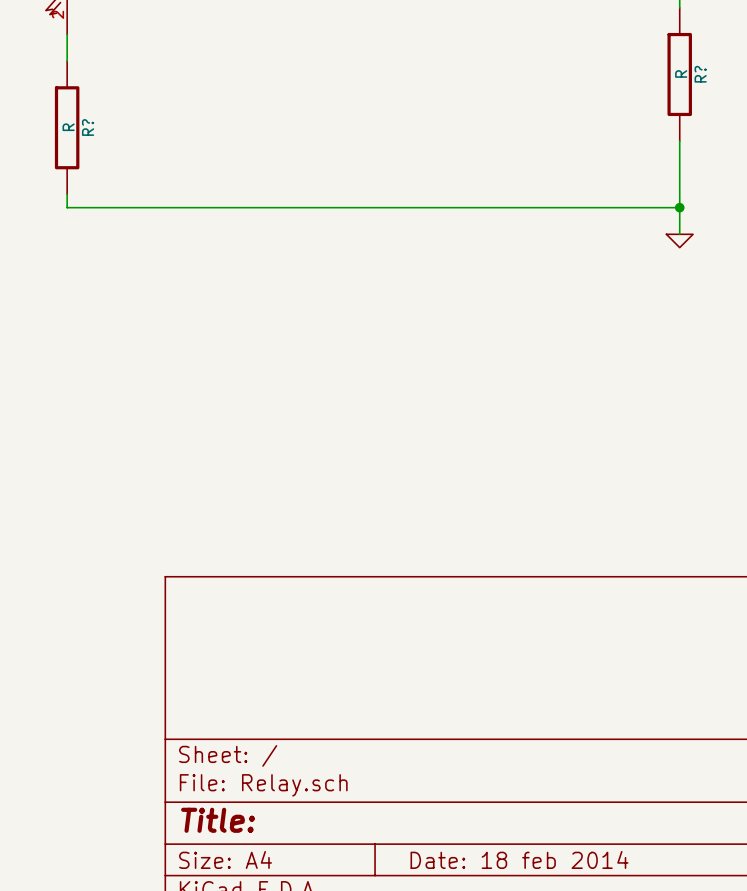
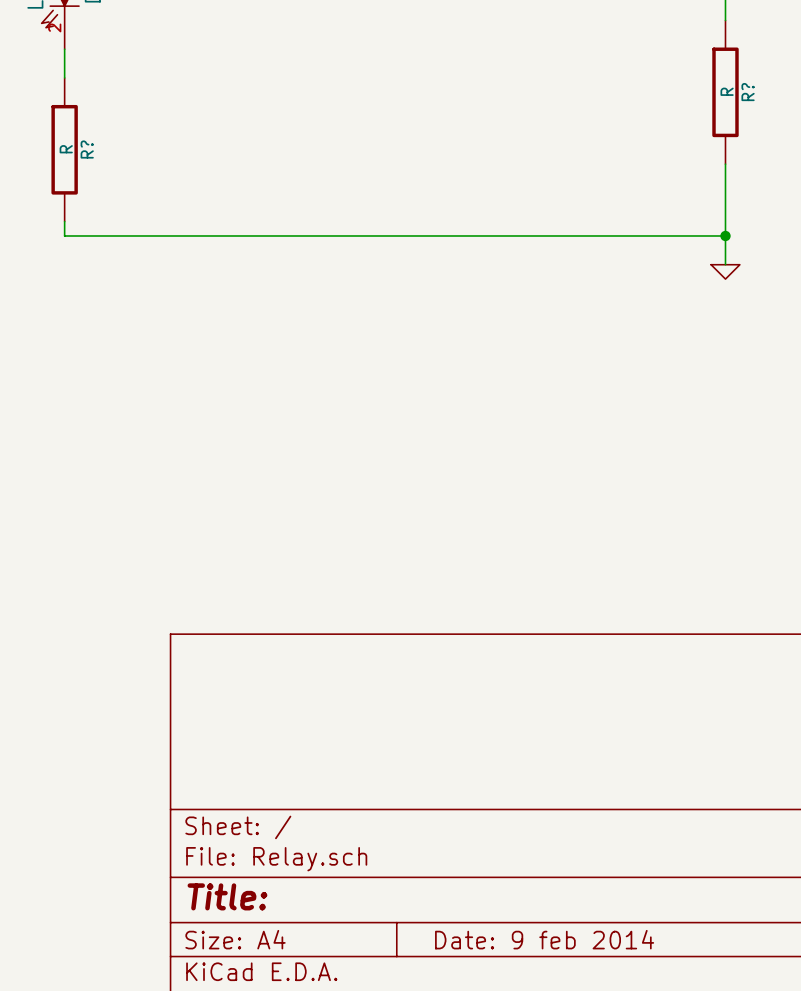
title block: Date: 18 feb 2014 (519, 859) -> Date: 9 feb 2014 (544, 939)

